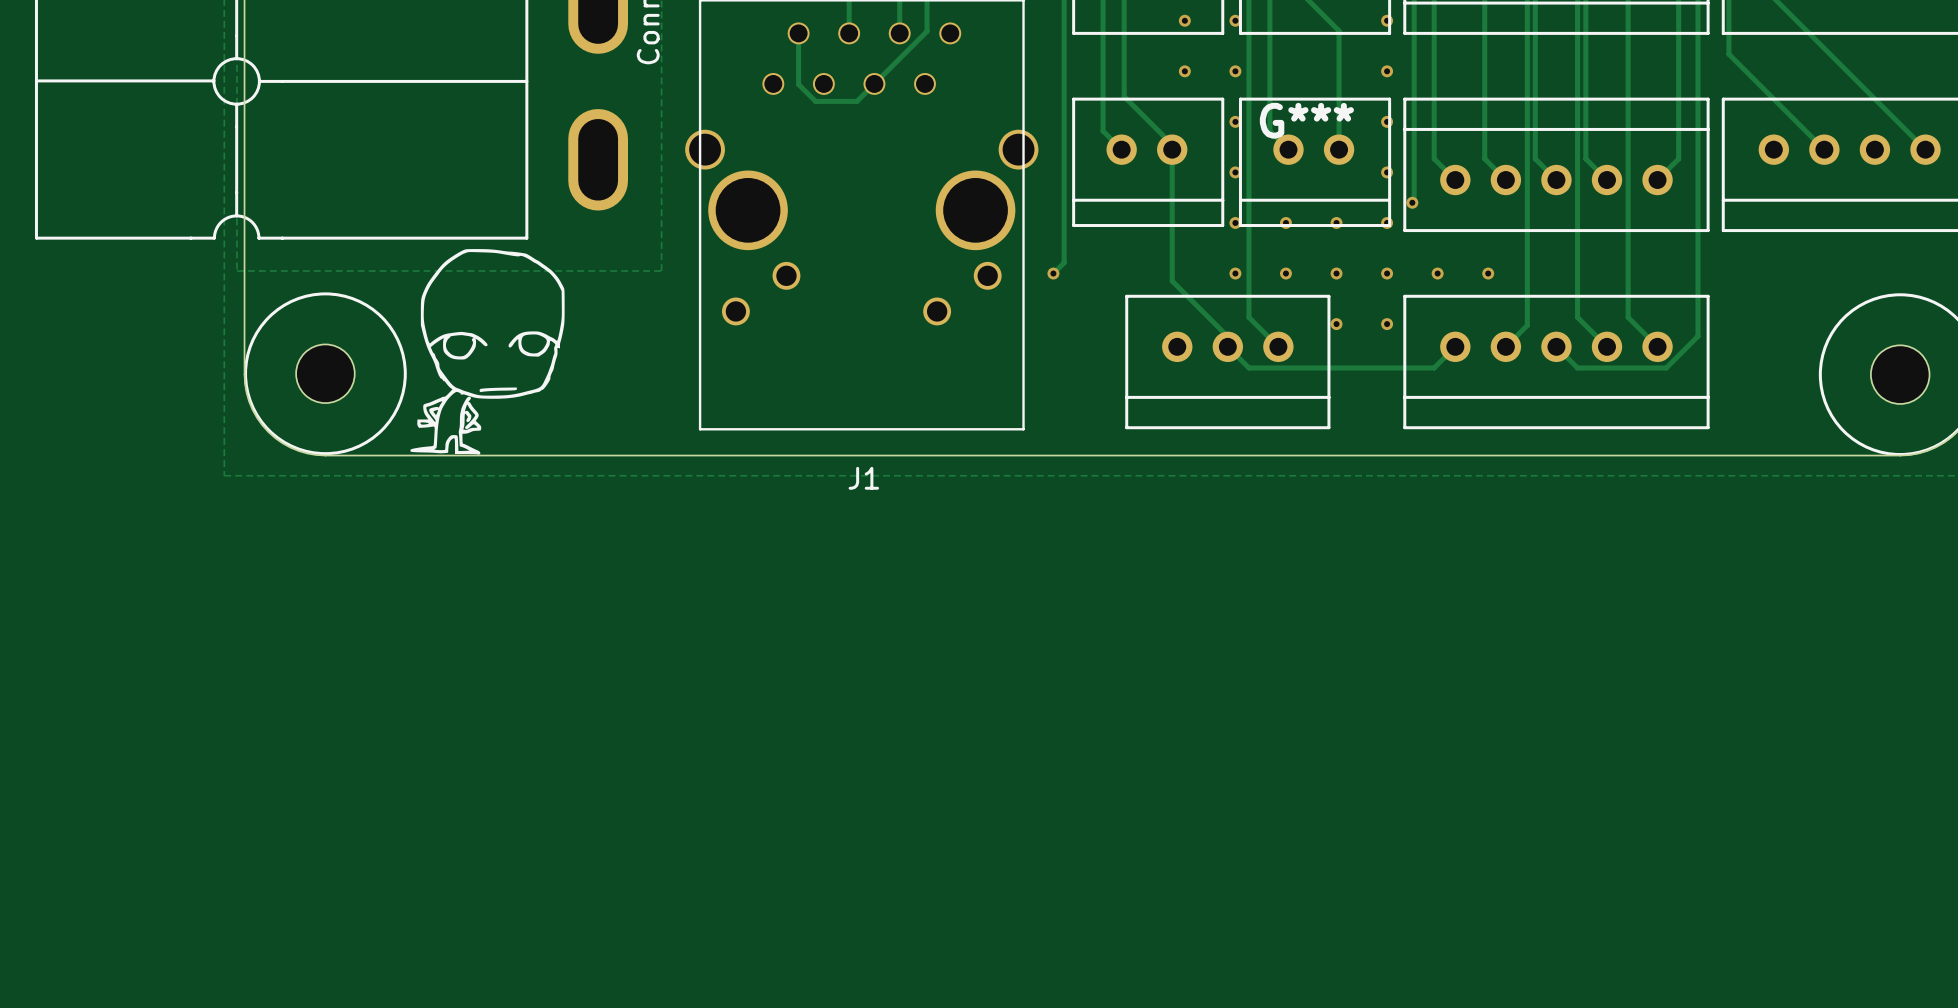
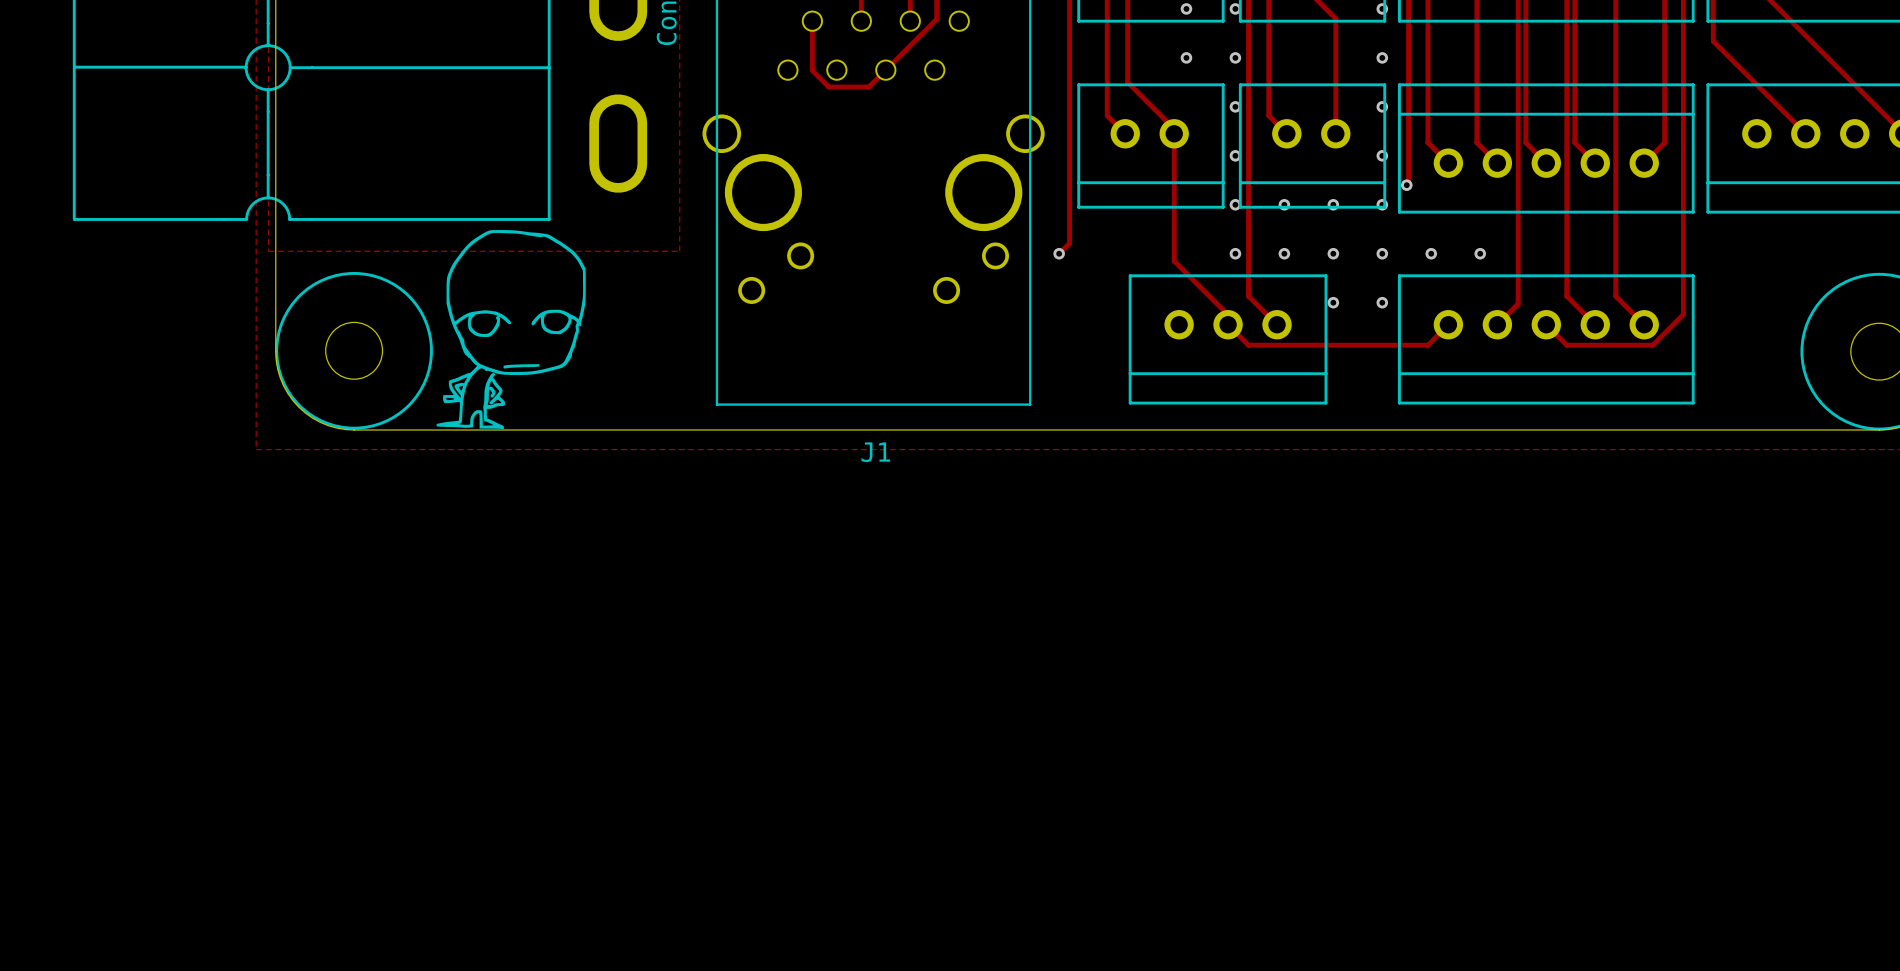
G***: (1306, 120) -> none

